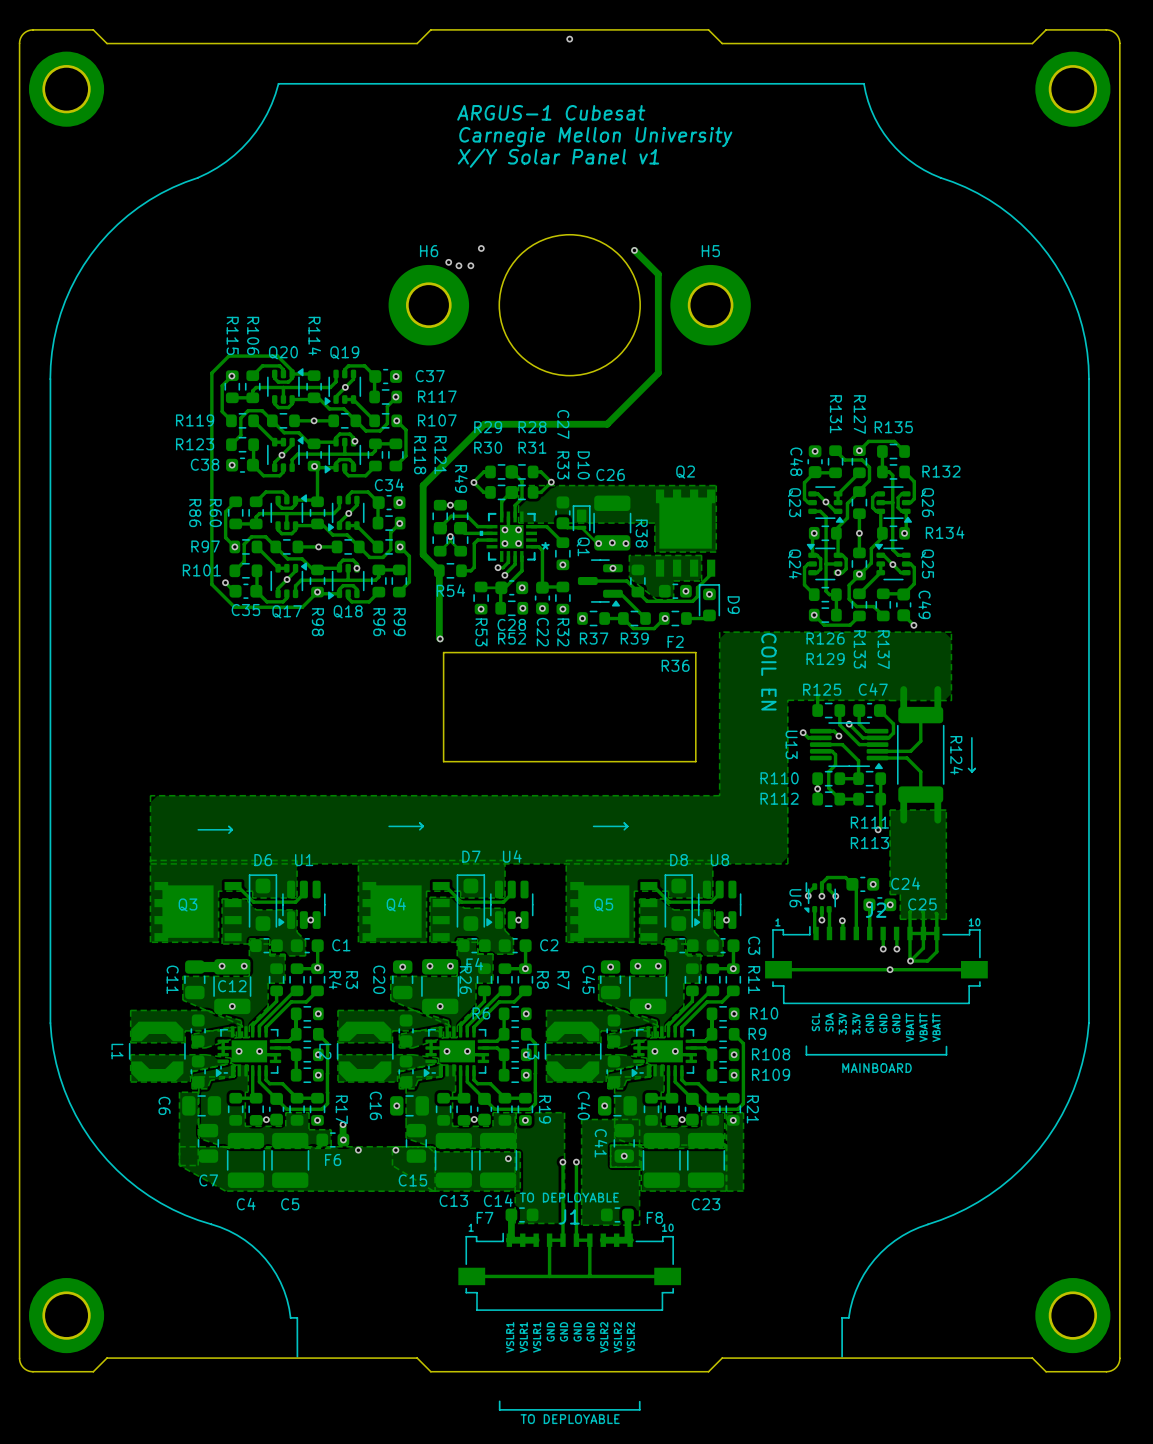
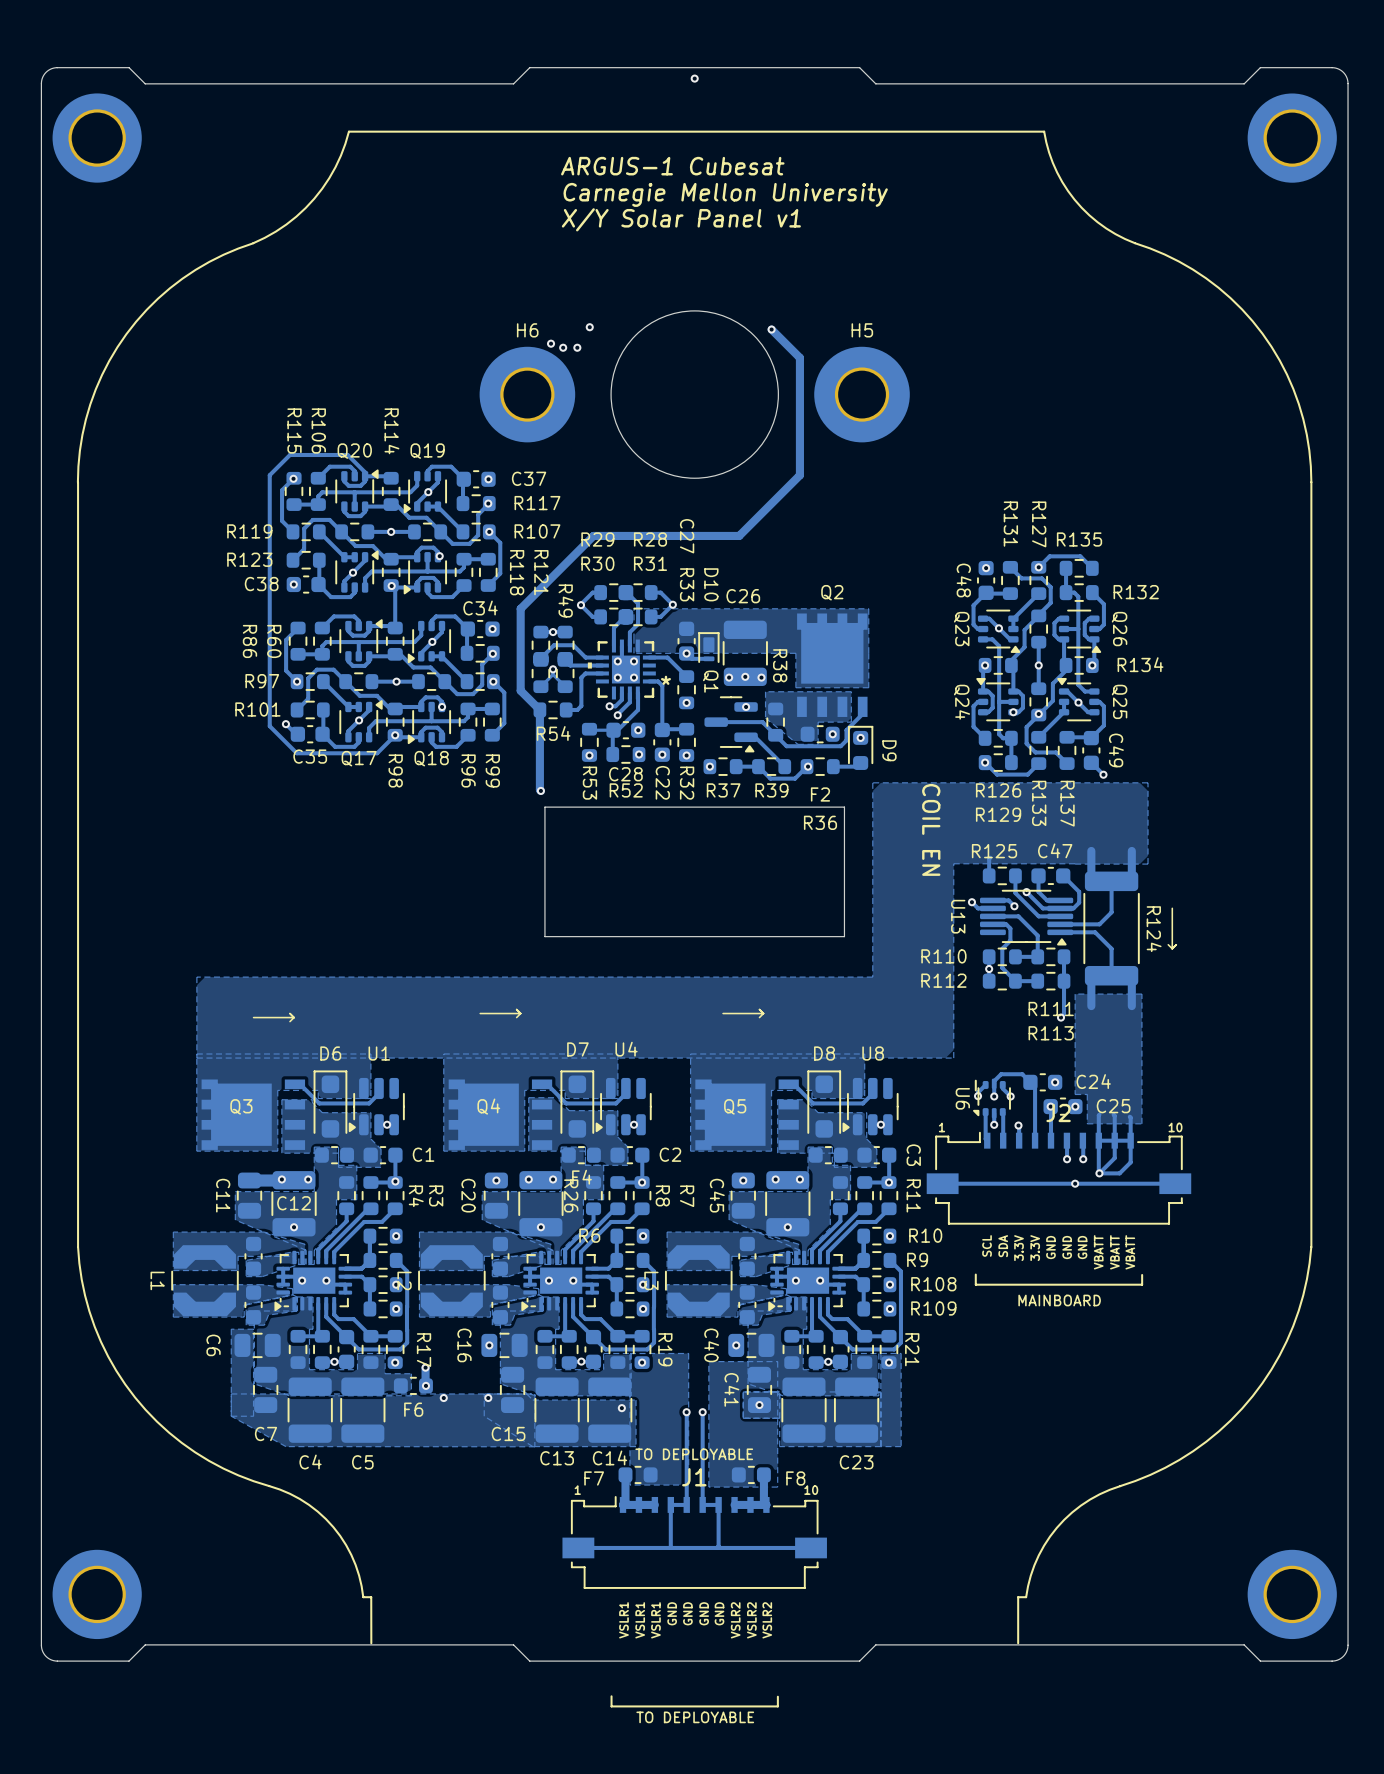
via: none -> (686, 653)
track: (581, 527) (598, 543) -> none

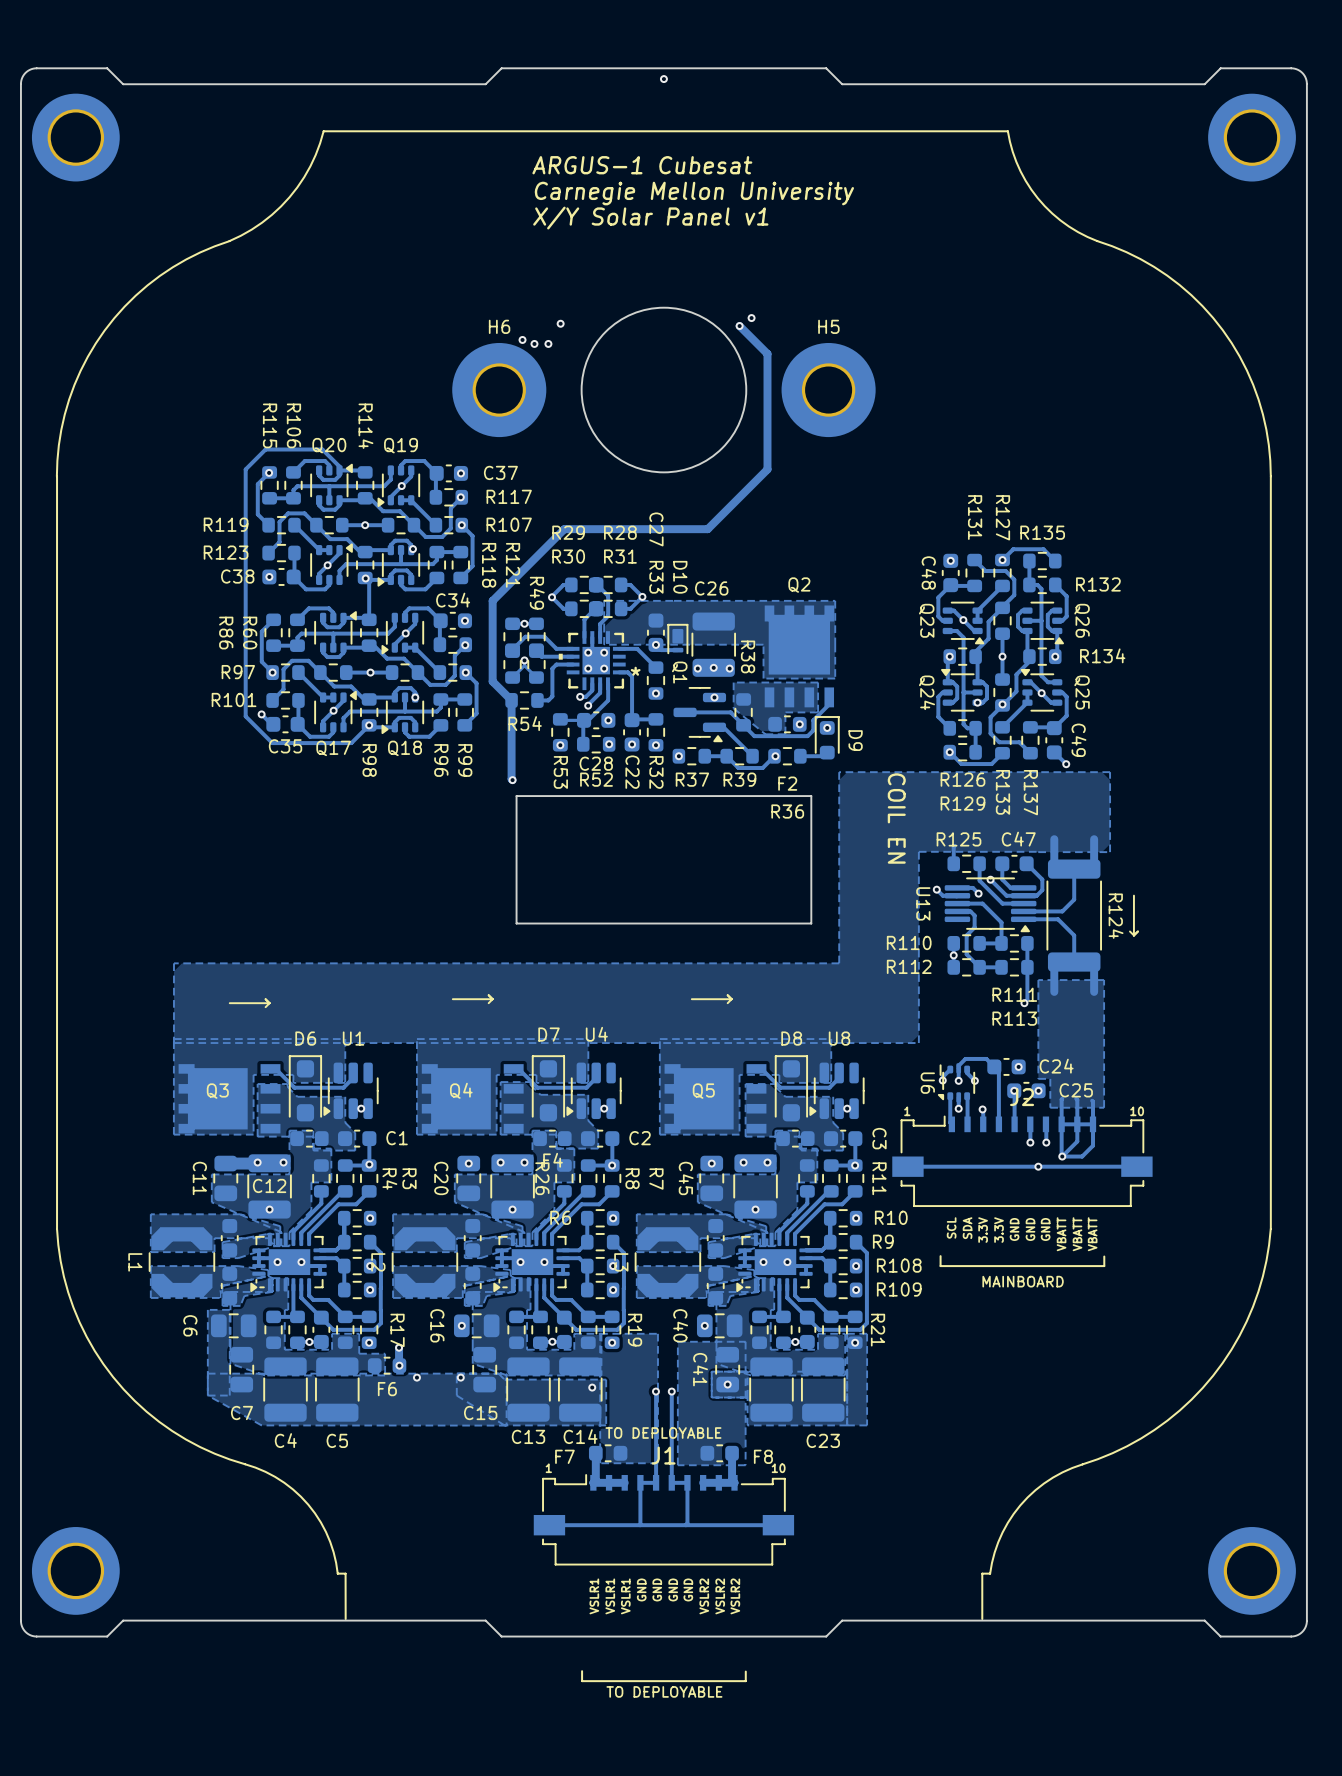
via: none -> (751, 318)

